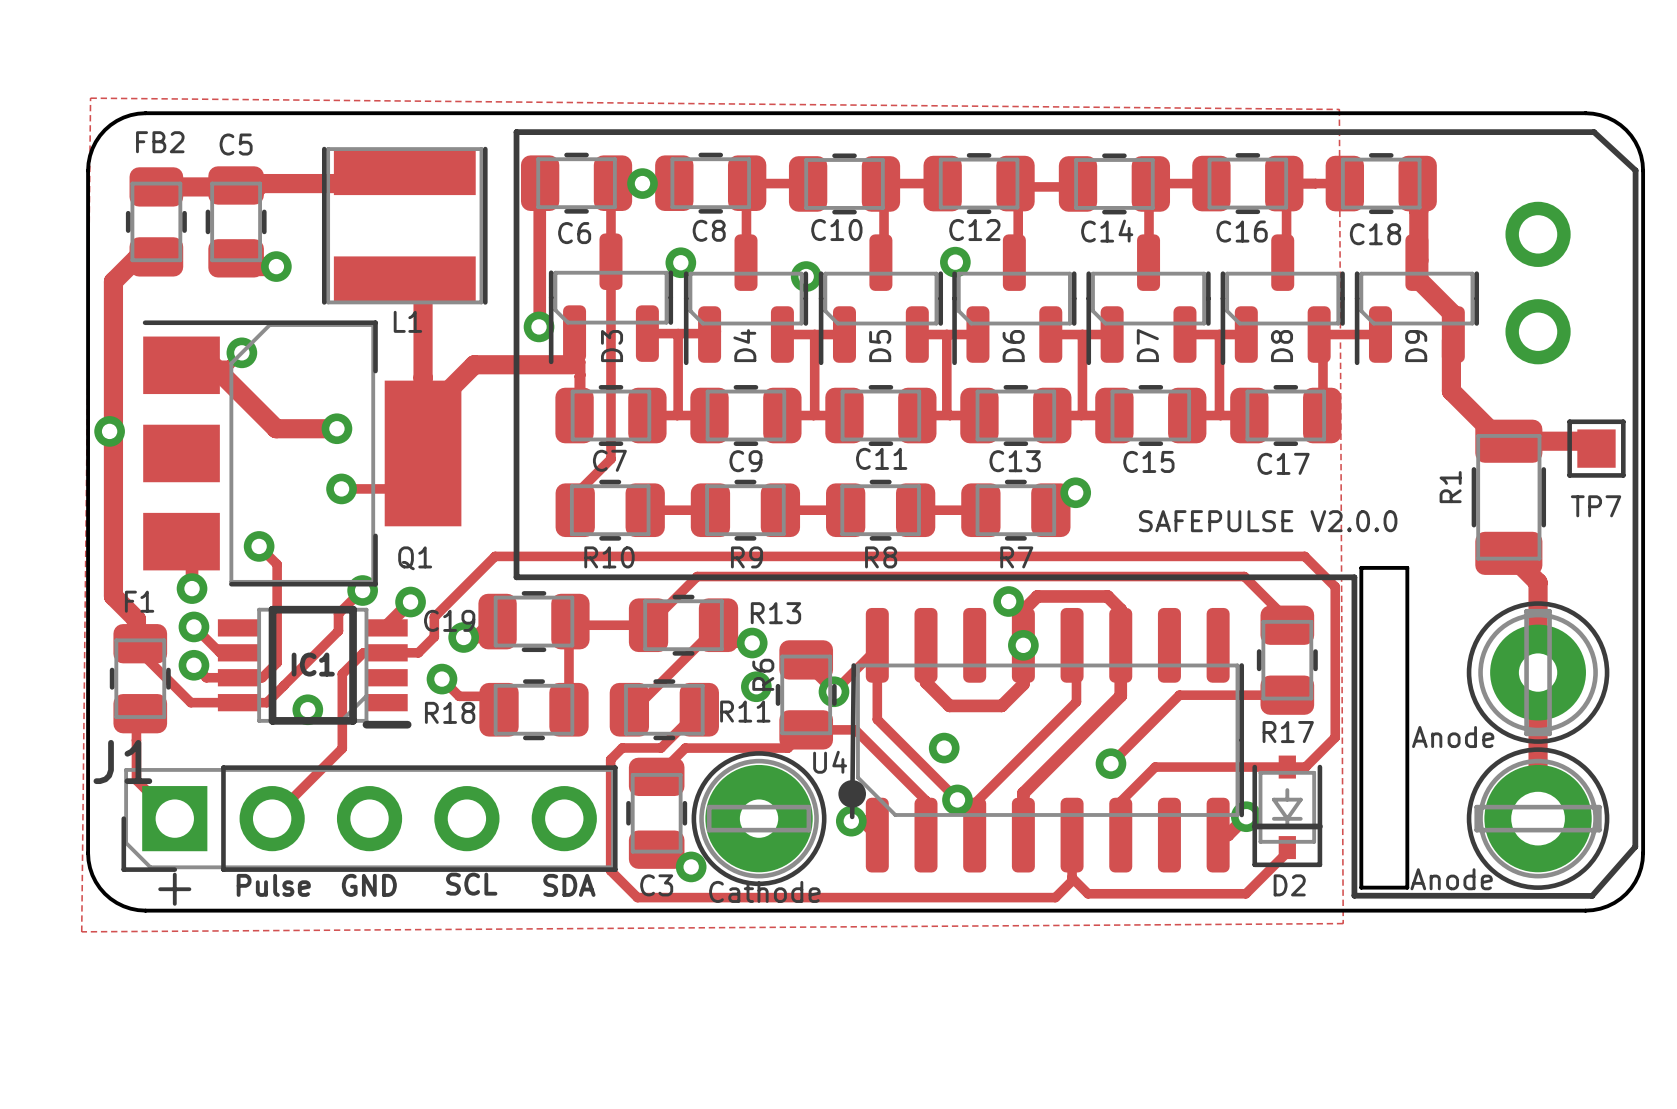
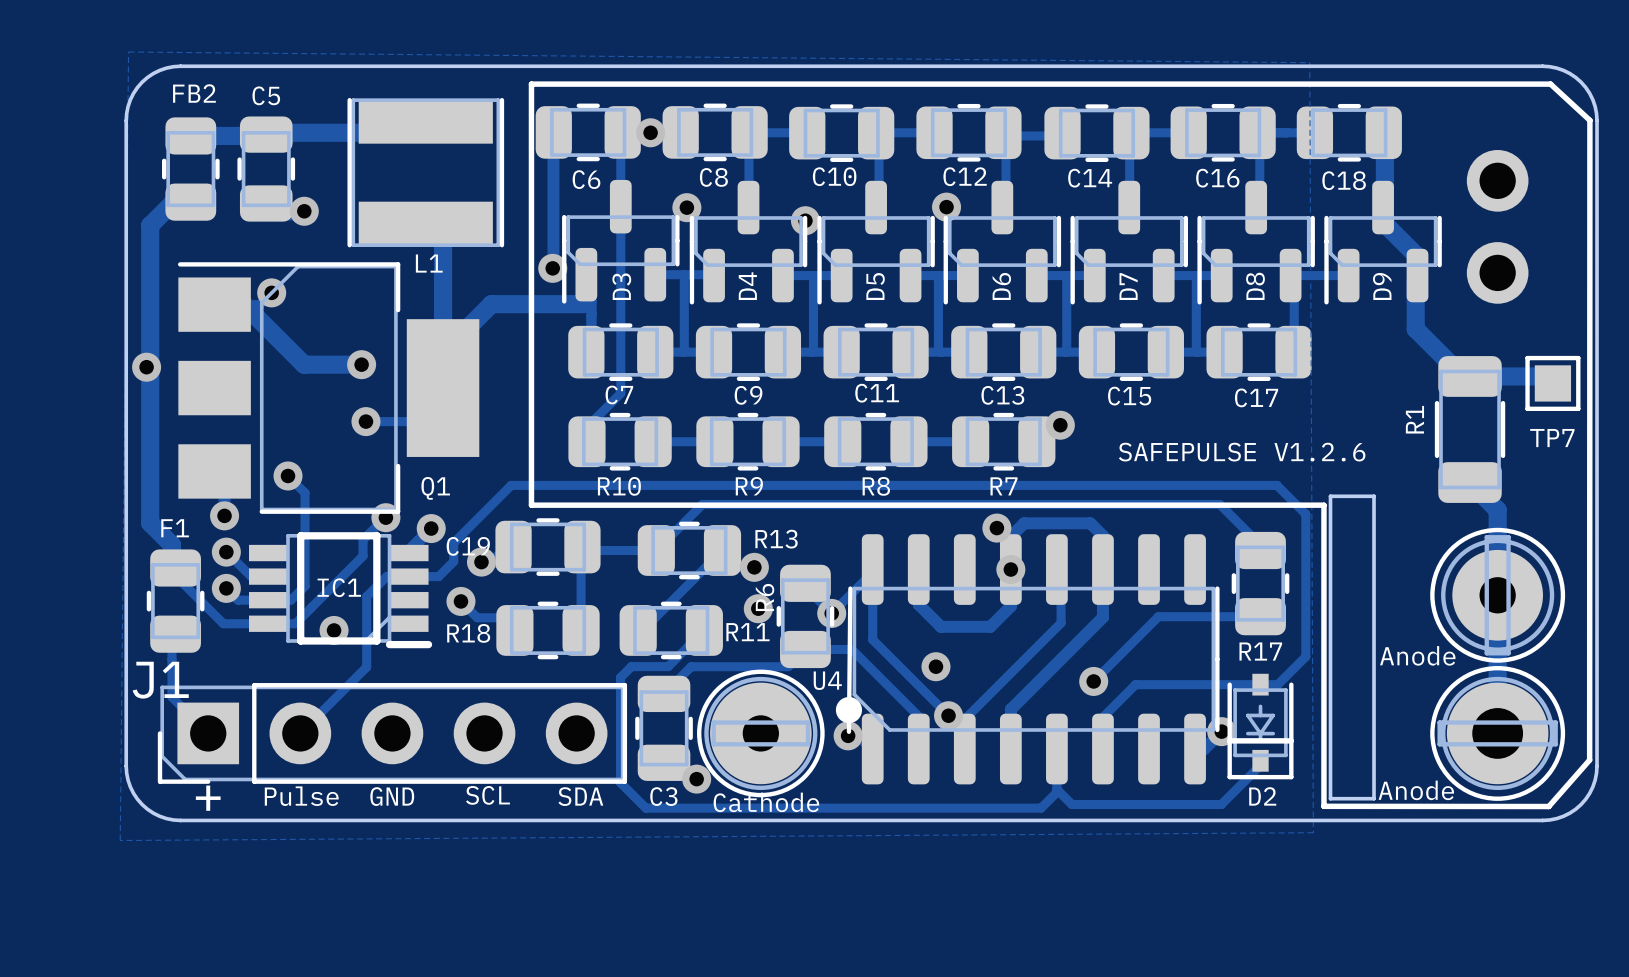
text: SAFEPULSE V2.0.0 (1268, 521) -> SAFEPULSE V1.2.6 (1242, 452)

